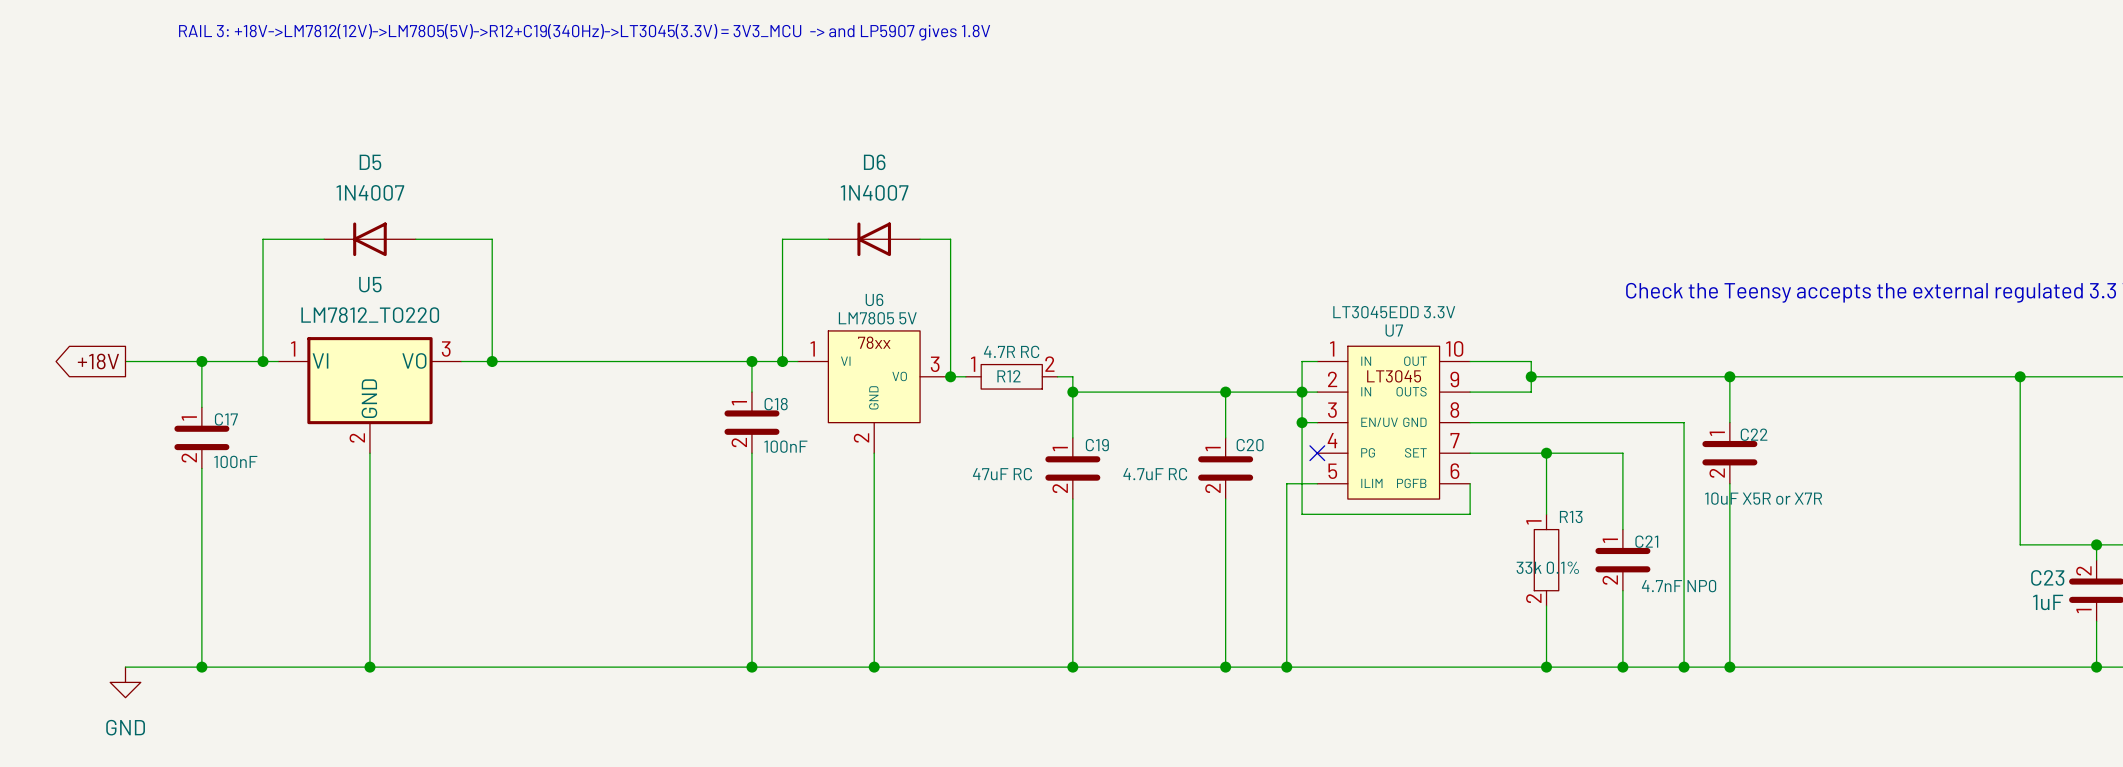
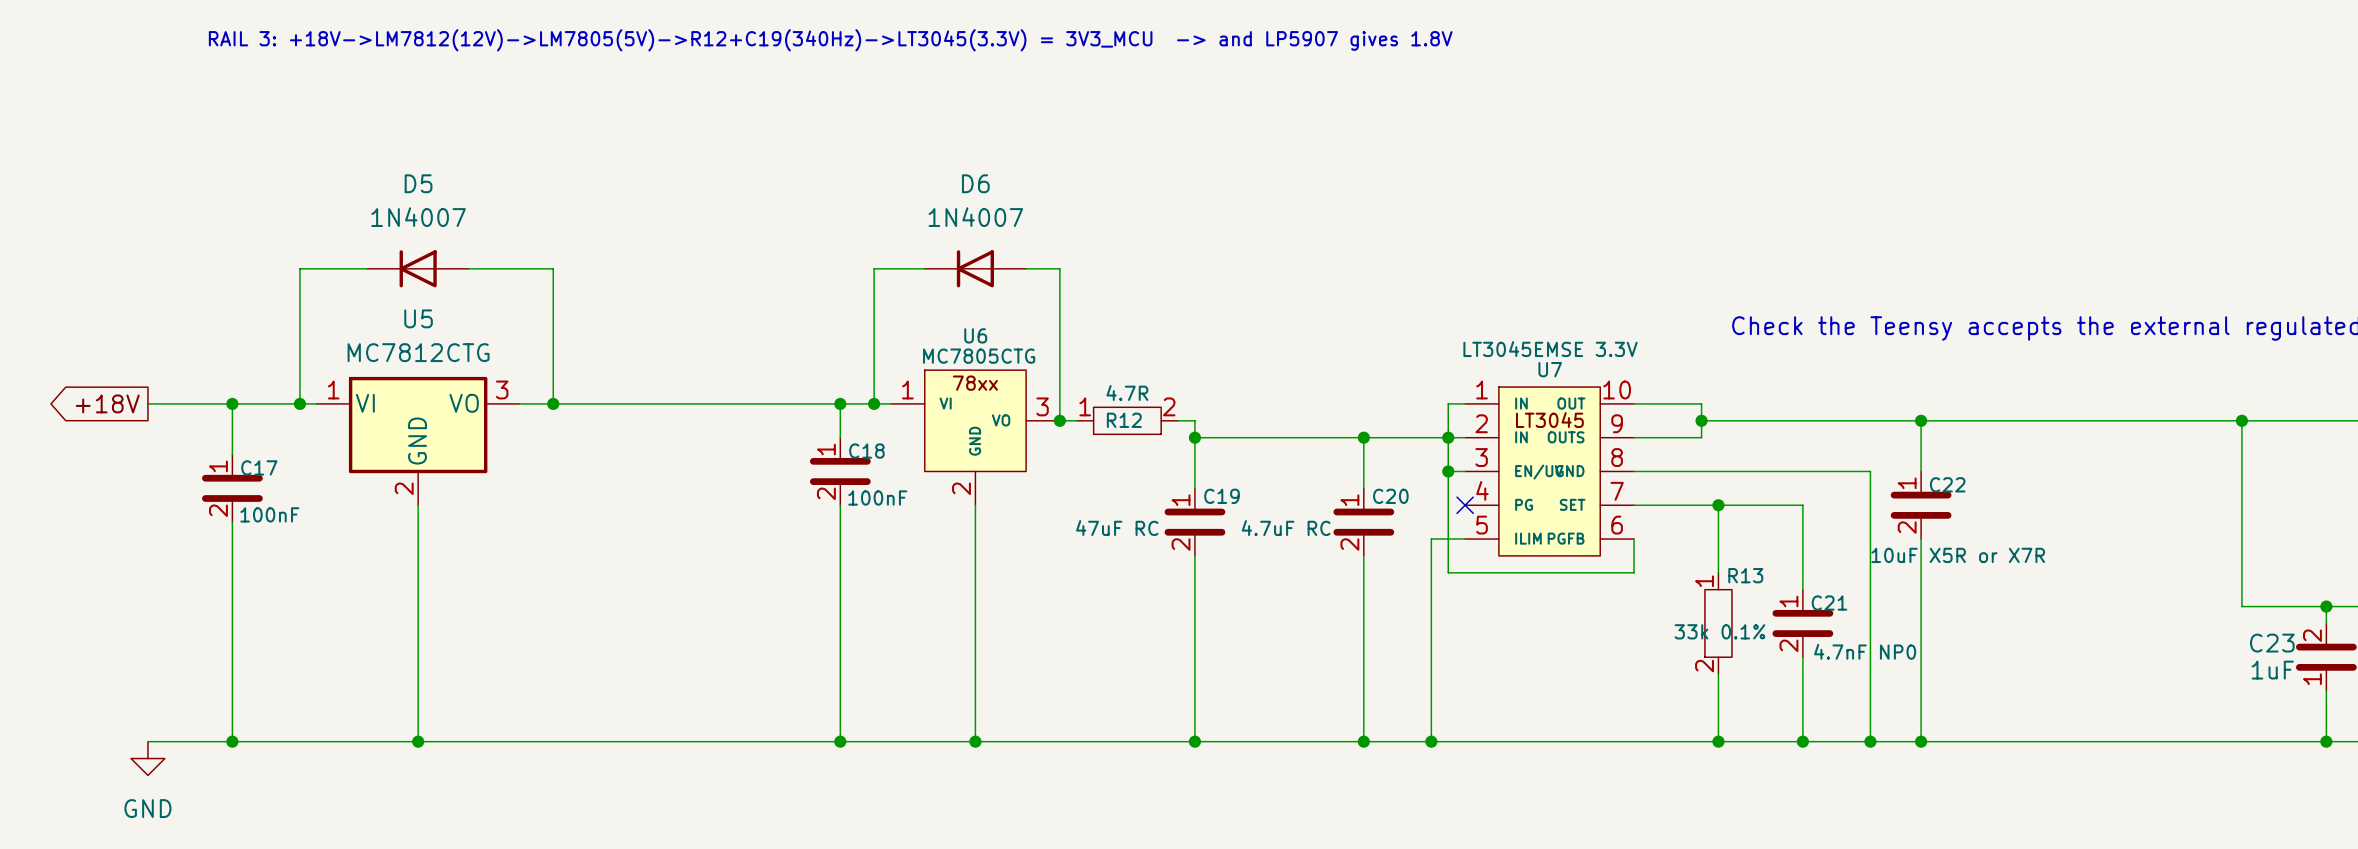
U7 value: LT3045EDD 3.3V (1394, 312) -> LT3045EMSE 3.3V (1550, 349)
U5 value: LM7812_TO220 (370, 315) -> MC7812CTG (418, 352)
U6 value: LM7805 5V (877, 318) -> MC7805CTG (979, 356)
R12 value: 4.7R RC (1011, 351) -> 4.7R (1127, 392)

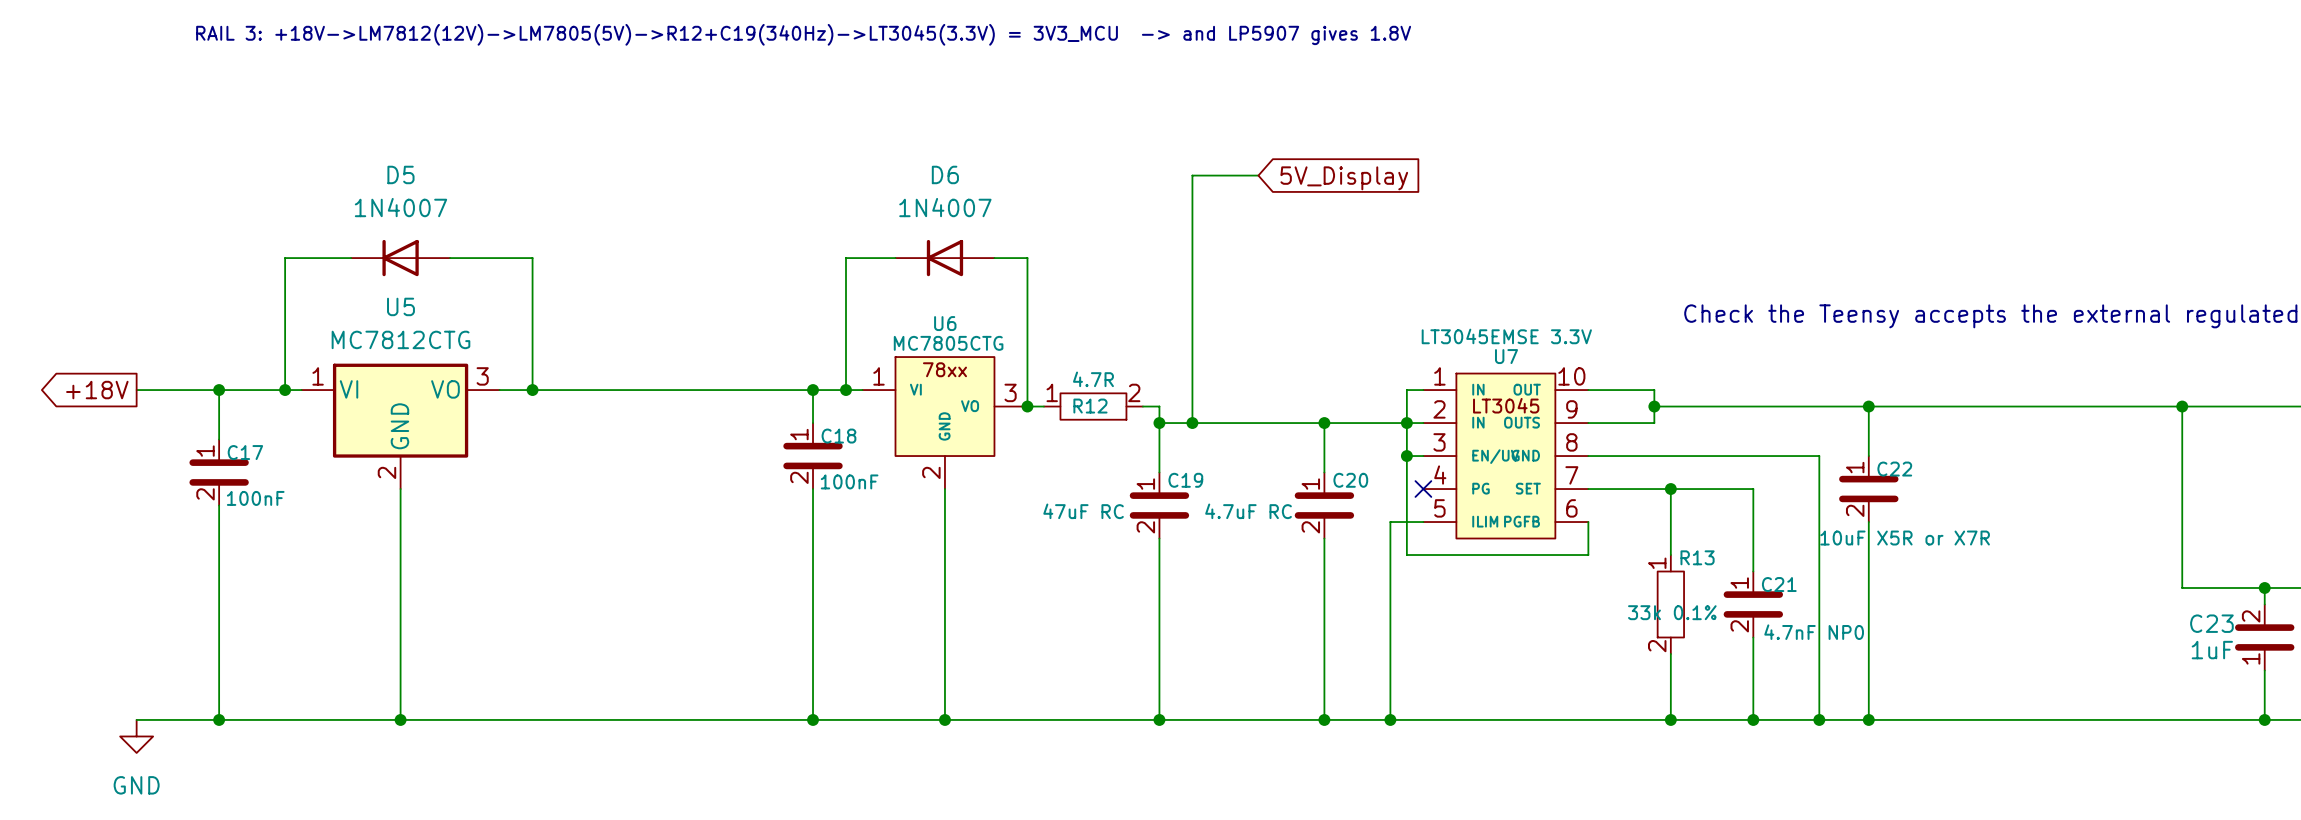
wire: none -> (1258, 175) (1192, 175) (1192, 423)
global label: none -> 5V_Display (1344, 178)
junction: none -> (1192, 423)

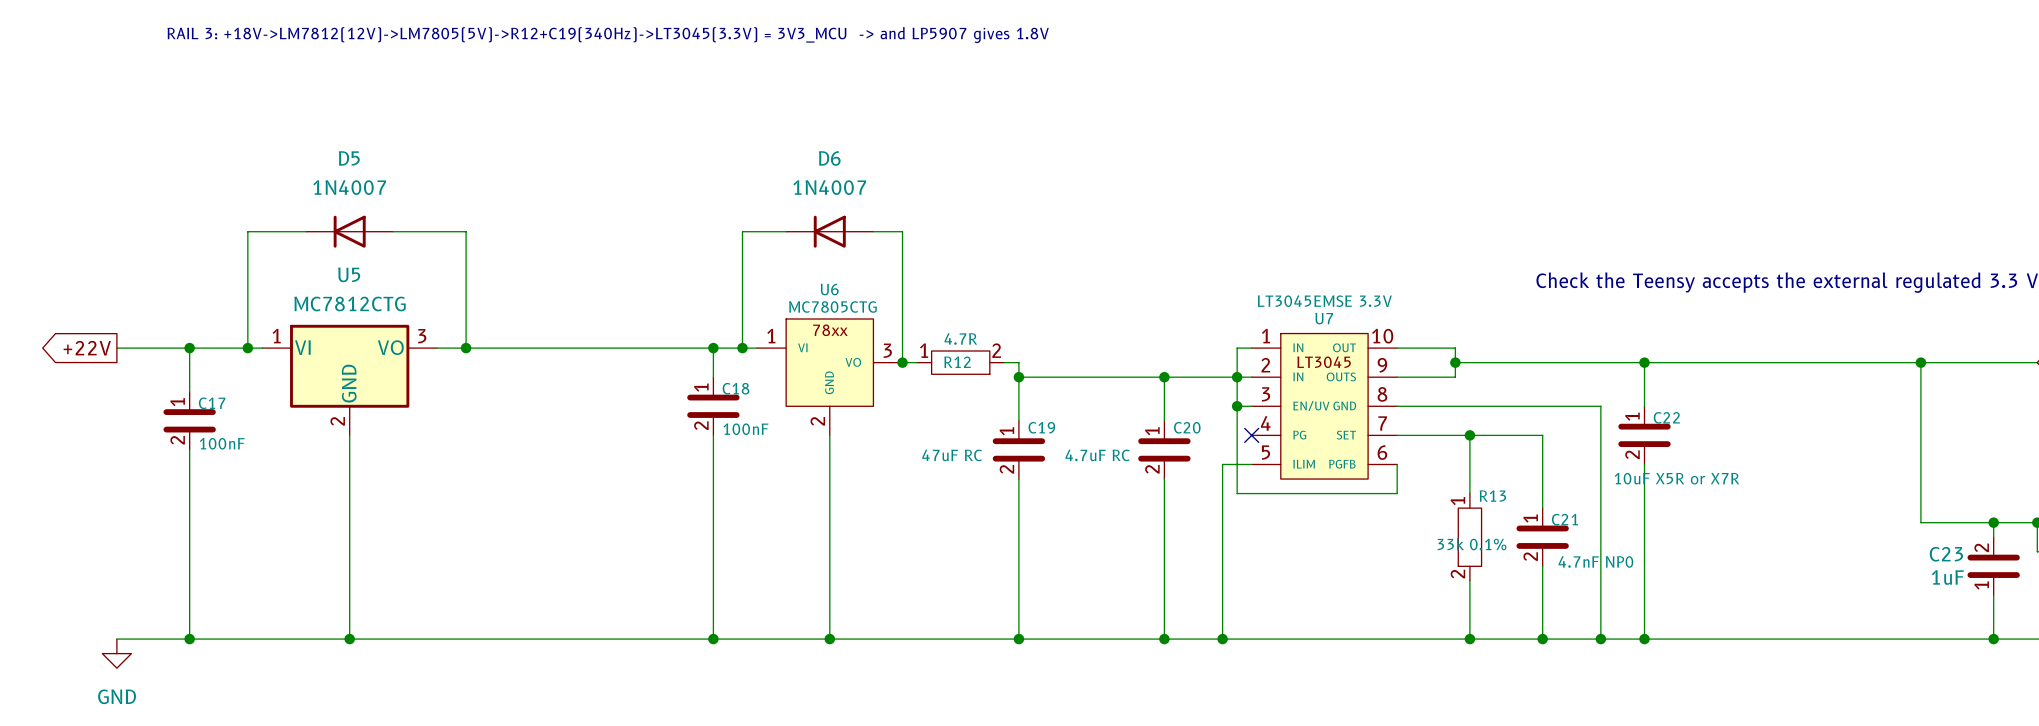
wire: (1258, 175) (1192, 175) (1192, 423) -> none
global label: 5V_Display (1344, 178) -> none
global label: +18V (97, 390) -> +22V (87, 348)
junction: (1192, 423) -> none

